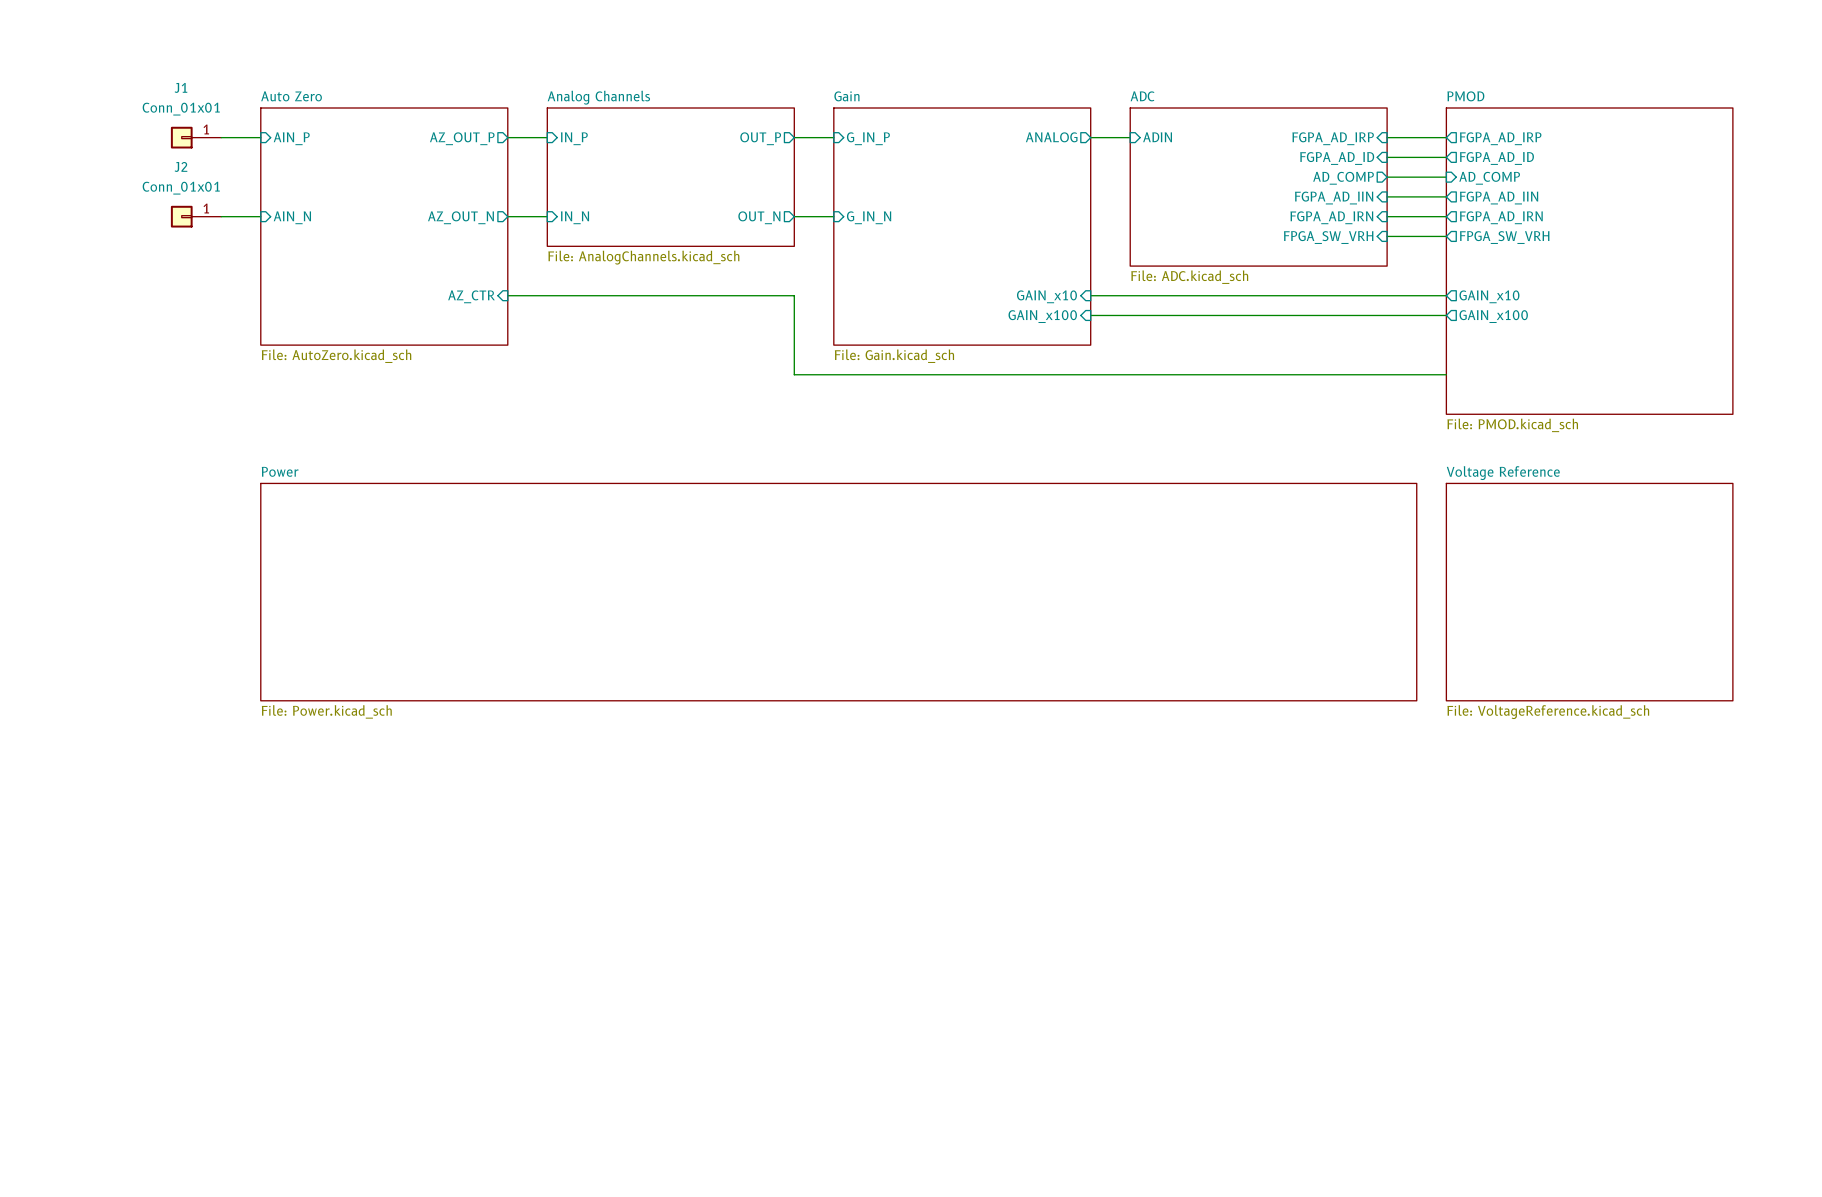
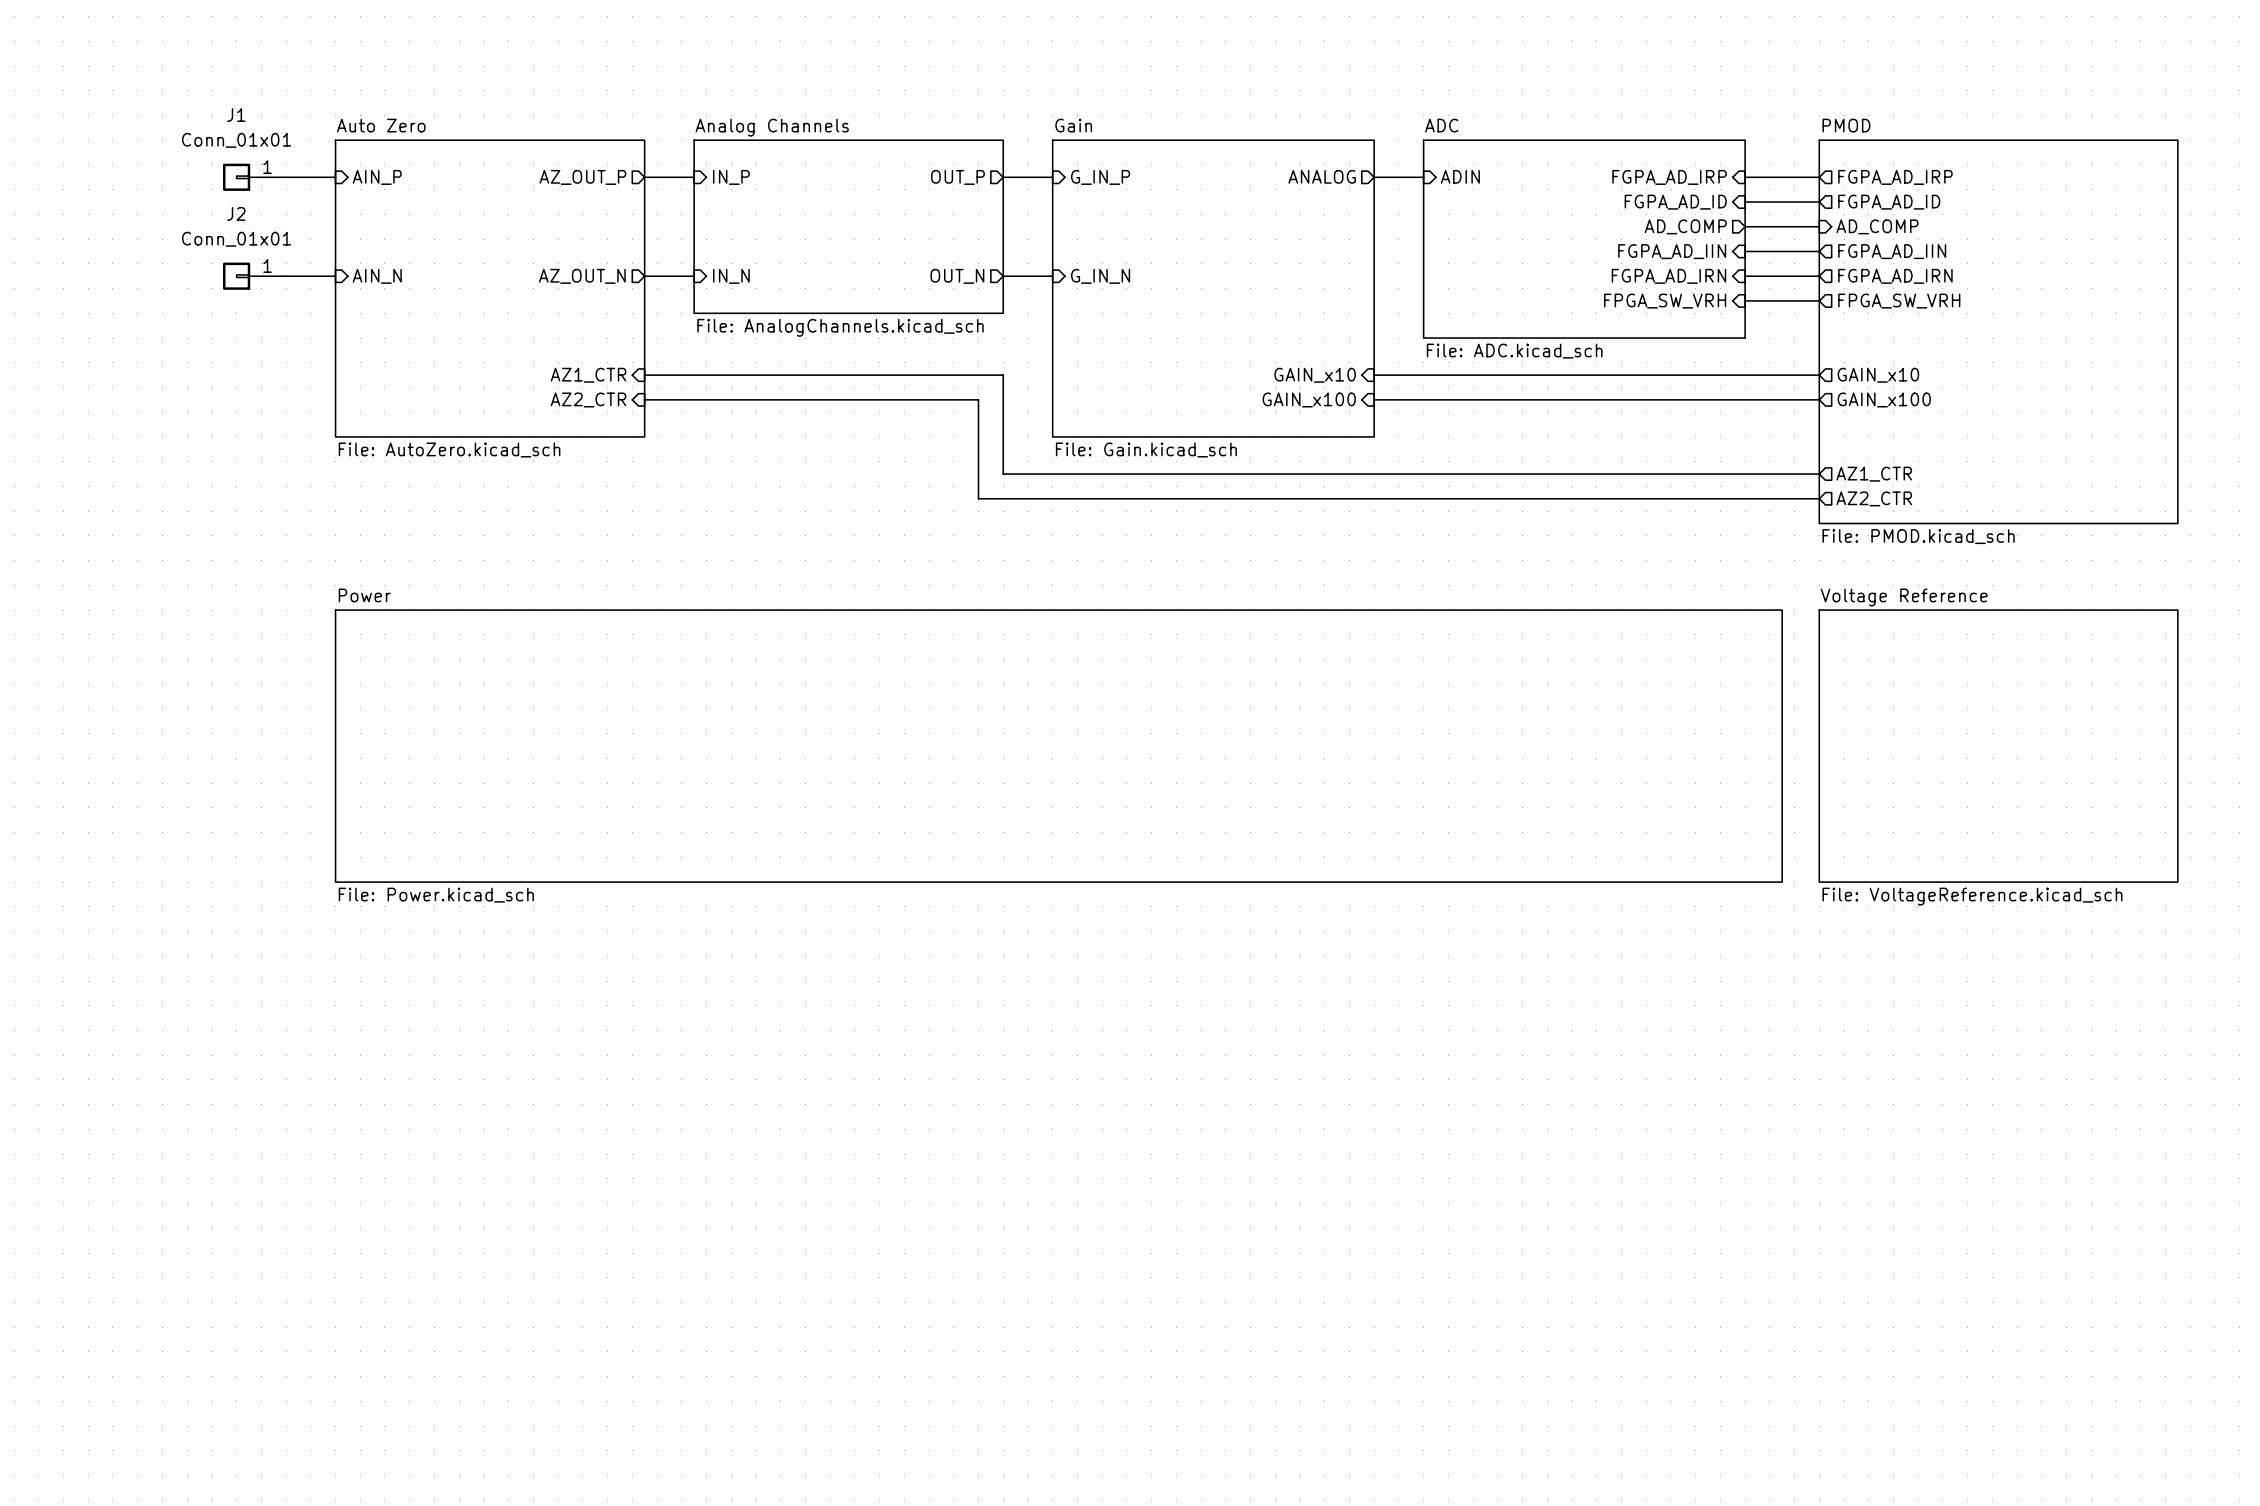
sheet pin: AZ_CTR (471, 296) -> AZ1_CTR (588, 375)
wire: none -> (644, 399) (978, 399) (978, 498) (1819, 498)
sheet pin: none -> AZ2_CTR (588, 399)
sheet pin: none -> AZ1_CTR (1874, 474)
sheet pin: none -> AZ2_CTR (1874, 498)

